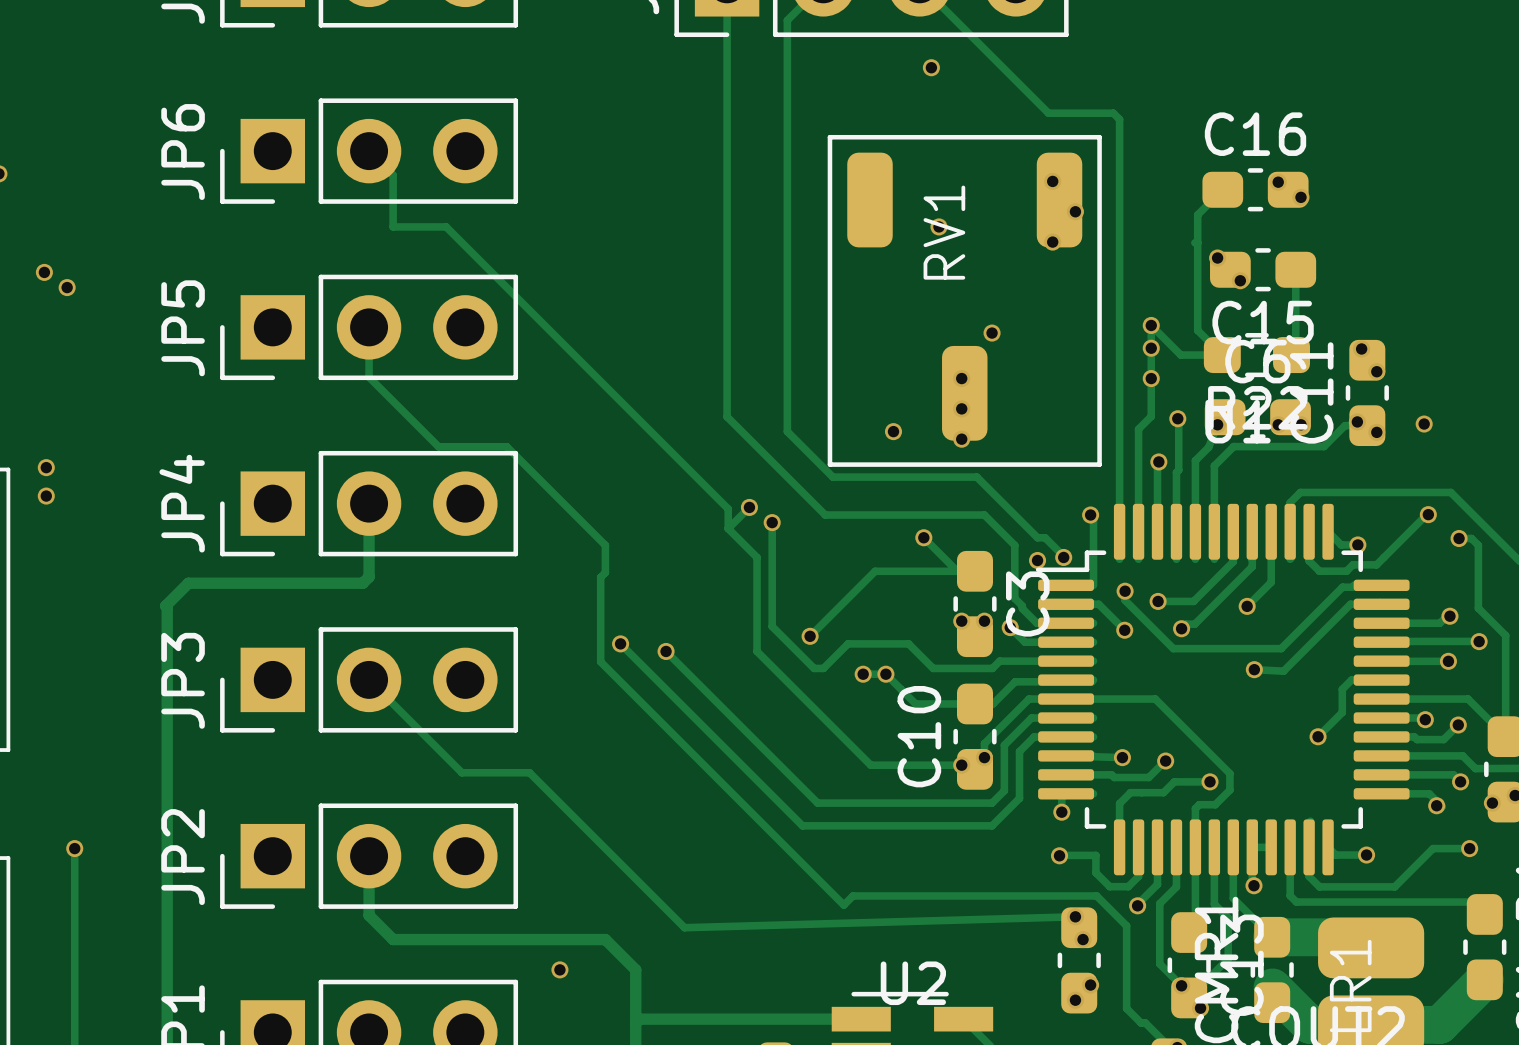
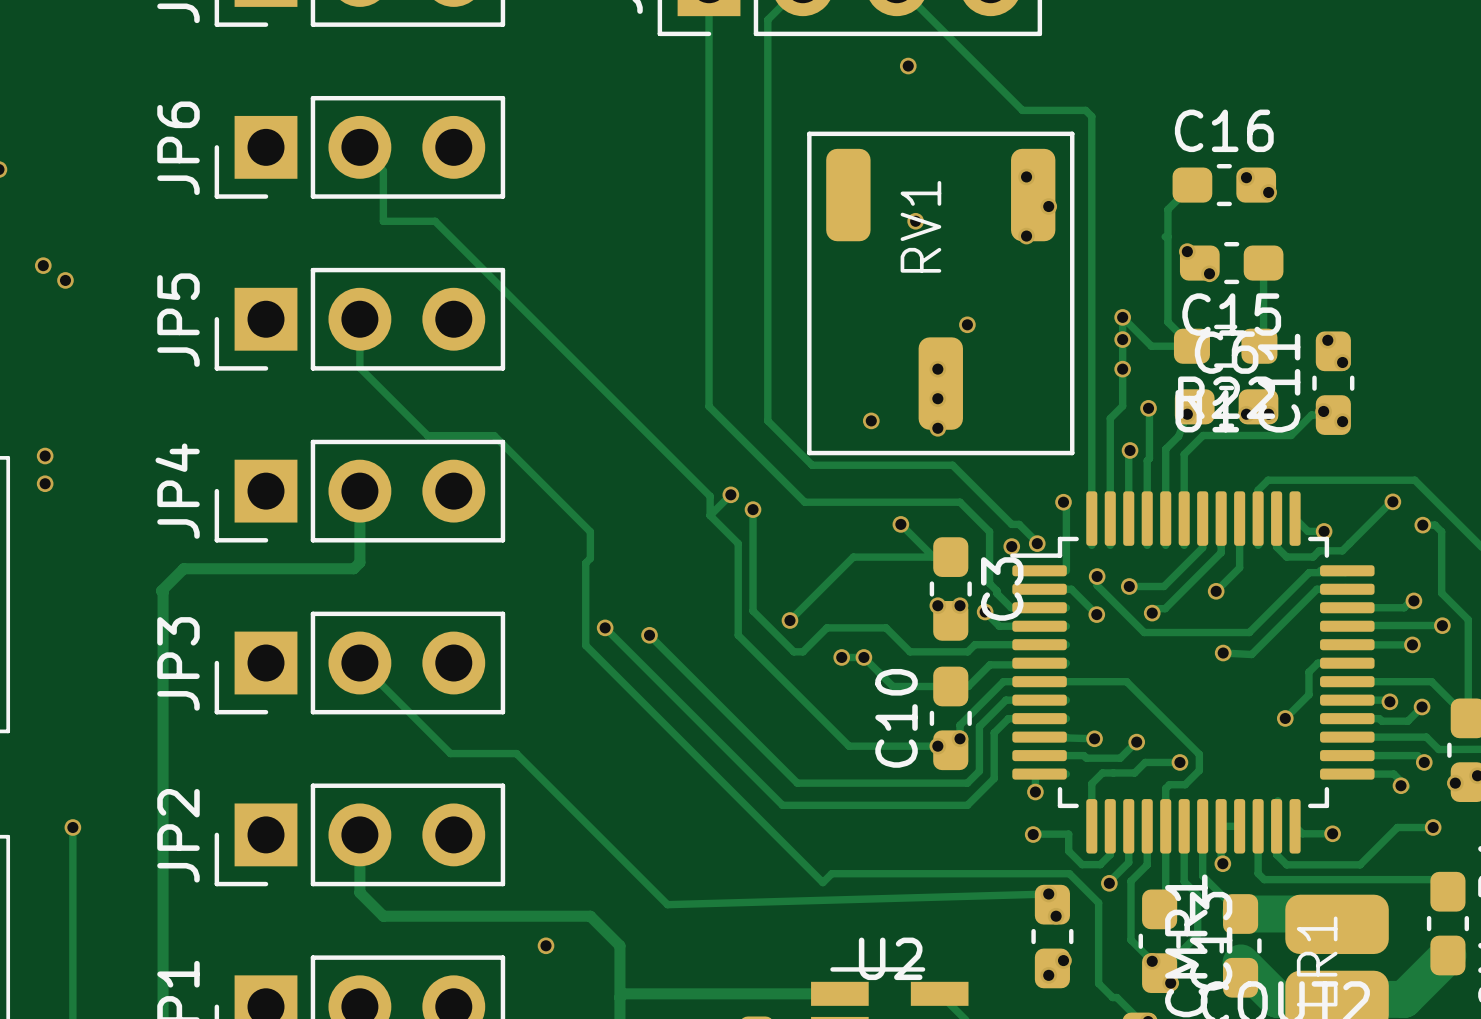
via: (1424, 424) -> none

